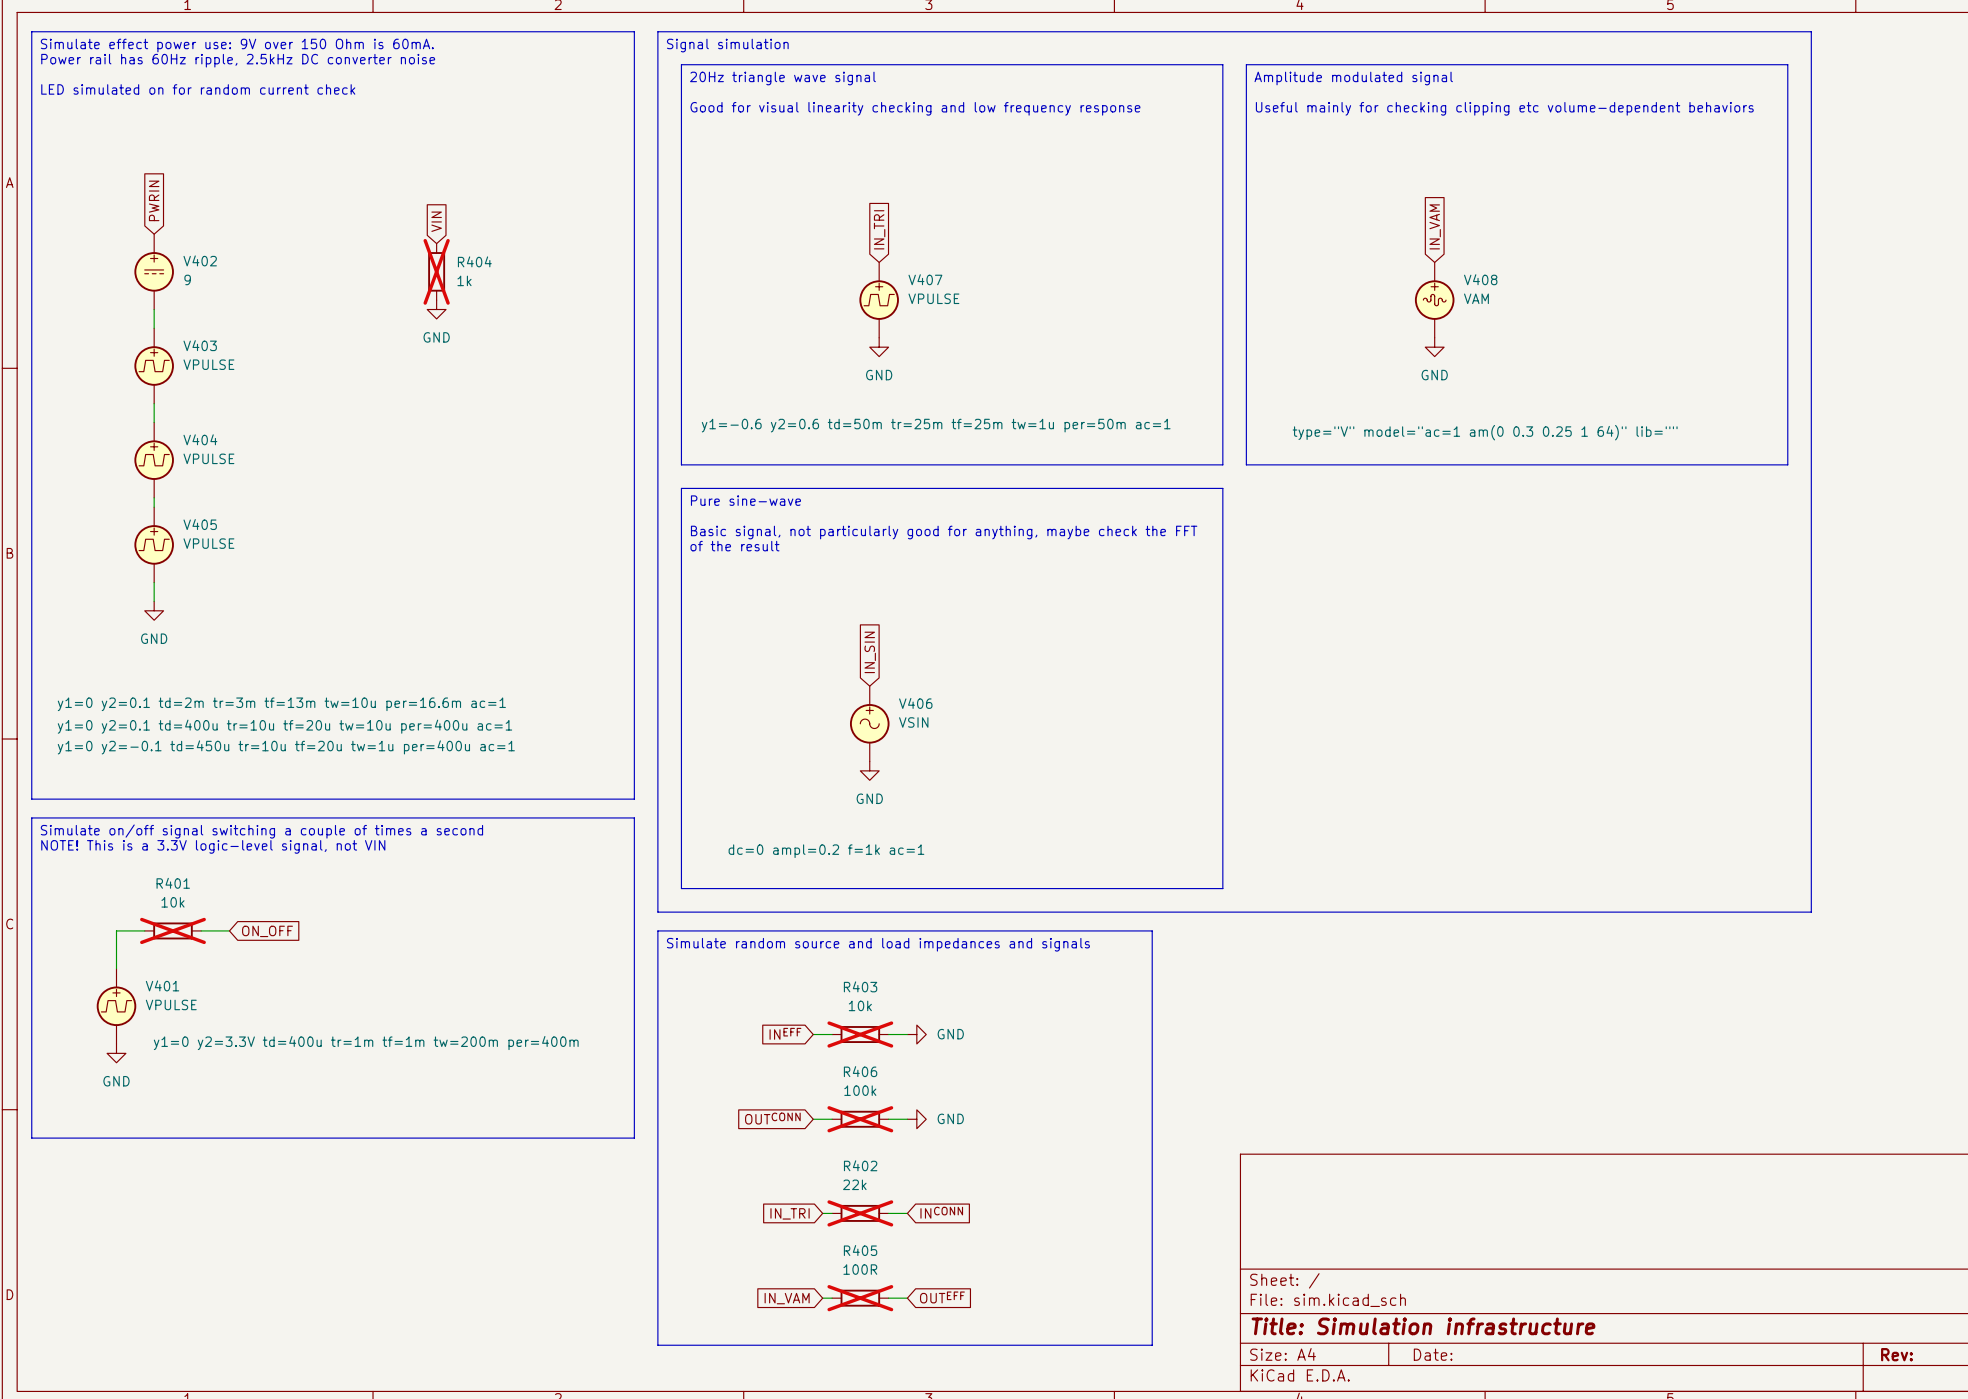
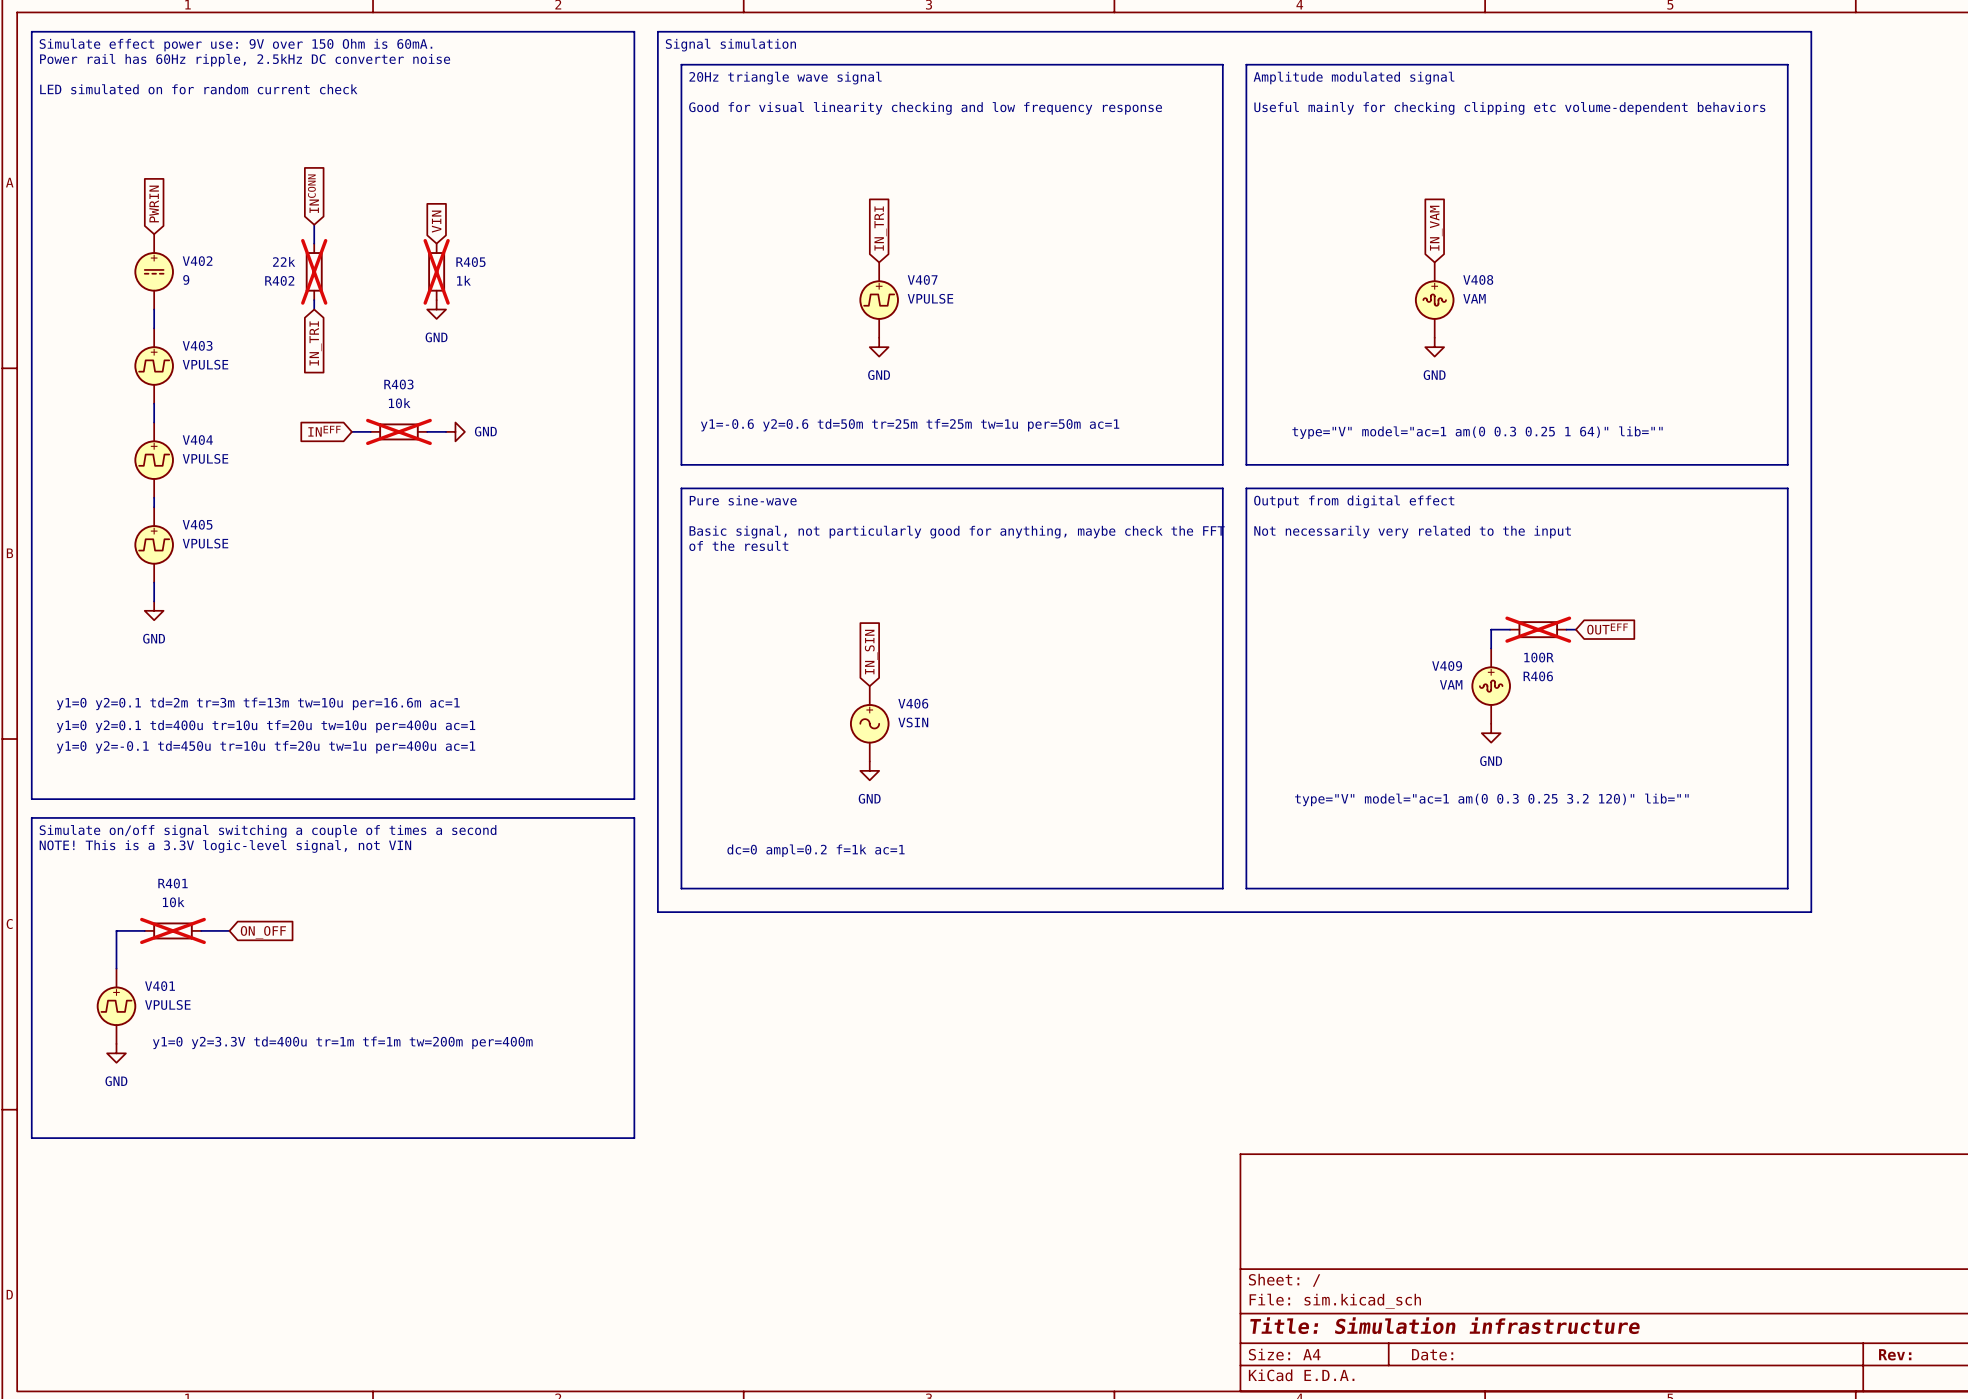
global label: none -> INCONN (313, 193)
wire: none -> (314, 224) (314, 243)
R404 name: R404 (474, 261) -> R405 (470, 262)
wire: none -> (314, 300) (314, 309)
global label: none -> IN_TRI (315, 343)
global label: none -> INEFF (324, 431)
wire: none -> (351, 431) (370, 431)
wire: none -> (427, 431) (446, 431)
power symbol: none -> GND (455, 431)
line: none -> (1246, 488) (1787, 488) (1787, 888) (1246, 888) (1246, 488)
text: none -> Output from digital effect (1354, 501)
text: none -> Not necessarily very related to the input (1412, 532)
global label: none -> OUTEFF (1607, 629)
wire: none -> (1510, 629) (1491, 629) (1491, 648)
wire: none -> (1566, 629) (1575, 629)
V409: none -> VAM (1491, 686)
power symbol: none -> GND (1491, 733)
line: (657, 930) (1152, 930) (1152, 1345) (657, 1345) (657, 930) -> none
text: Simulate random source and load impedances and signals (878, 944) -> none
global label: INEFF (785, 1033) -> none
wire: (813, 1034) (832, 1034) -> none
R403 position: (860, 1034) -> (398, 431)
wire: (888, 1034) (907, 1034) -> none
power symbol: GND (916, 1034) -> none
R406 name position: R406 (860, 1071) -> R406 (1538, 676)
R406 value: 100k (860, 1090) -> 100R (1539, 657)
global label: OUTCONN (772, 1118) -> none
wire: (813, 1119) (832, 1119) -> none
R406 position: (860, 1119) -> (1538, 629)
wire: (888, 1119) (907, 1119) -> none
power symbol: GND (916, 1119) -> none
R402 name position: R402 (860, 1165) -> R402 (279, 280)
R402 value position: 22k (854, 1184) -> 22k (284, 261)
global label: INCONN (941, 1212) -> none
global label: IN_TRI (790, 1213) -> none
wire: (822, 1213) (832, 1213) -> none
R402 rotation: 0° (860, 1213) -> 90° clockwise (314, 271)
R402 position: (860, 1213) -> (314, 271)
wire: (888, 1213) (907, 1213) -> none
global label: OUTEFF (942, 1297) -> none
global label: IN_VAM (787, 1298) -> none
wire: (822, 1298) (832, 1298) -> none
R405: 100R (860, 1298) -> none
wire: (888, 1298) (907, 1298) -> none

